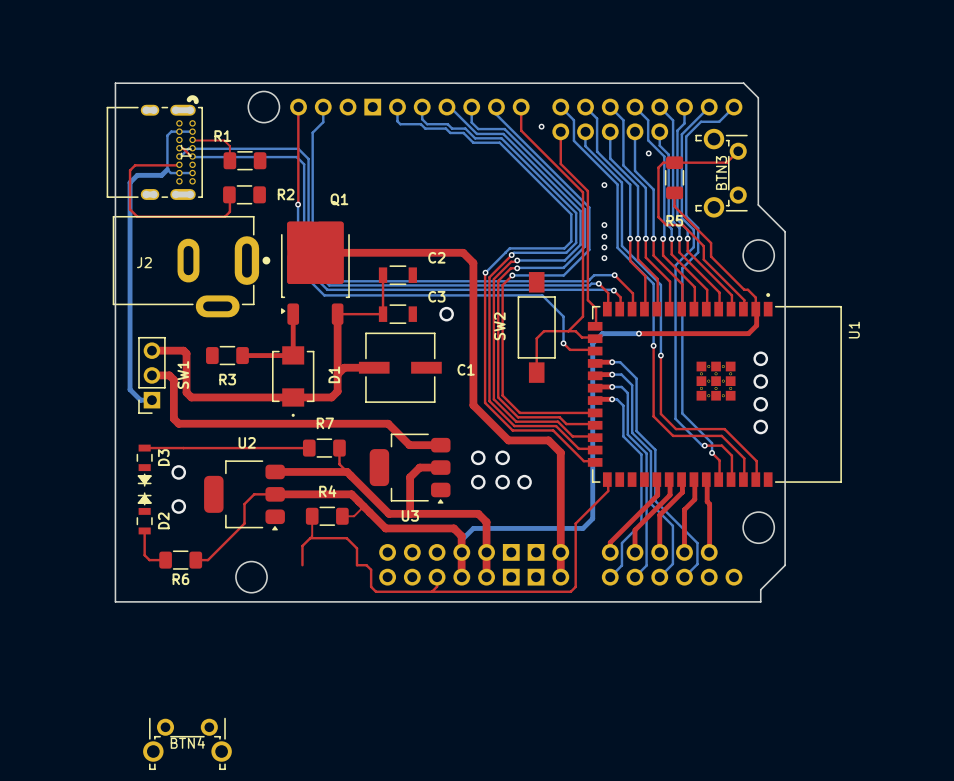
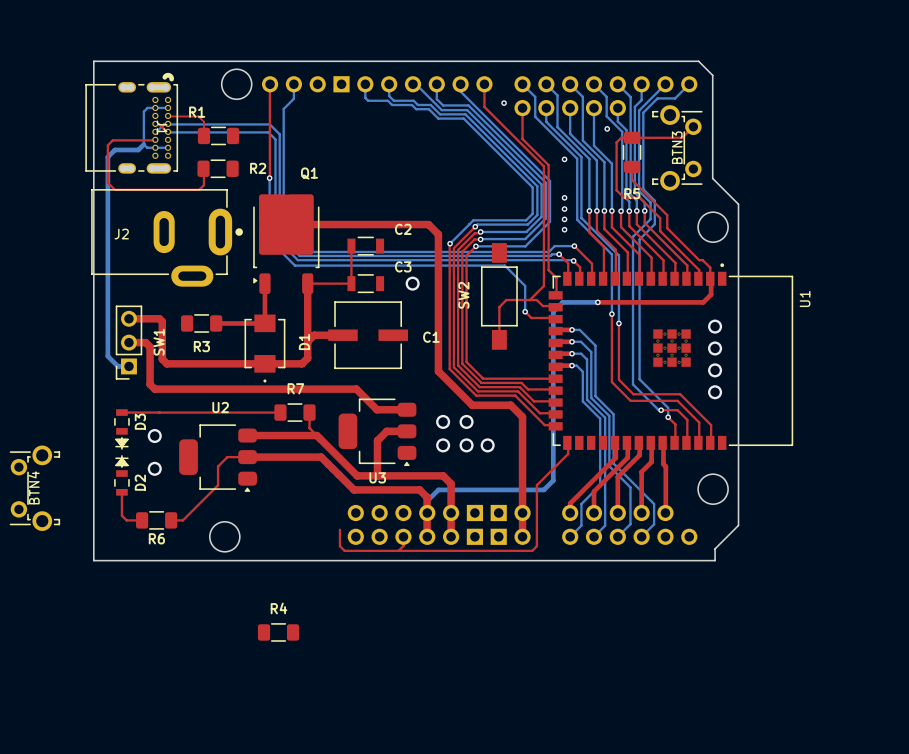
top track: (363, 506) (354, 516) (342, 516) -> none
R4 position: (327, 516) -> (278, 632)
top track: (312, 521) (312, 536) (310, 538) -> none
top track: (310, 538) (346, 538) (357, 548) (357, 565) (366, 565) (371, 569) -> none
top track: (310, 538) (302, 545) (302, 565) -> none
BTN4 rotation: 0° (187, 743) -> 90° counterclockwise (34, 488)
BTN4 position: (187, 743) -> (34, 488)

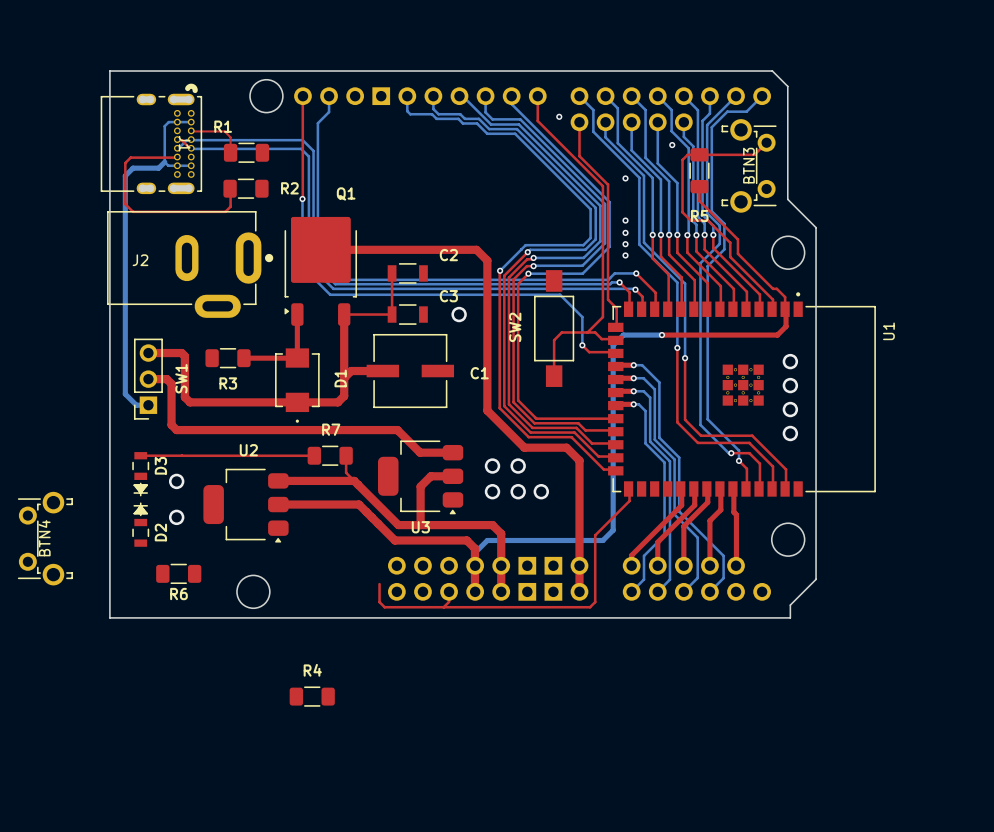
top track: (247, 457) (227, 457) (218, 466) (218, 485) (182, 520) (171, 520) -> none
top track: (121, 492) (121, 515) (126, 520) (142, 520) -> none

